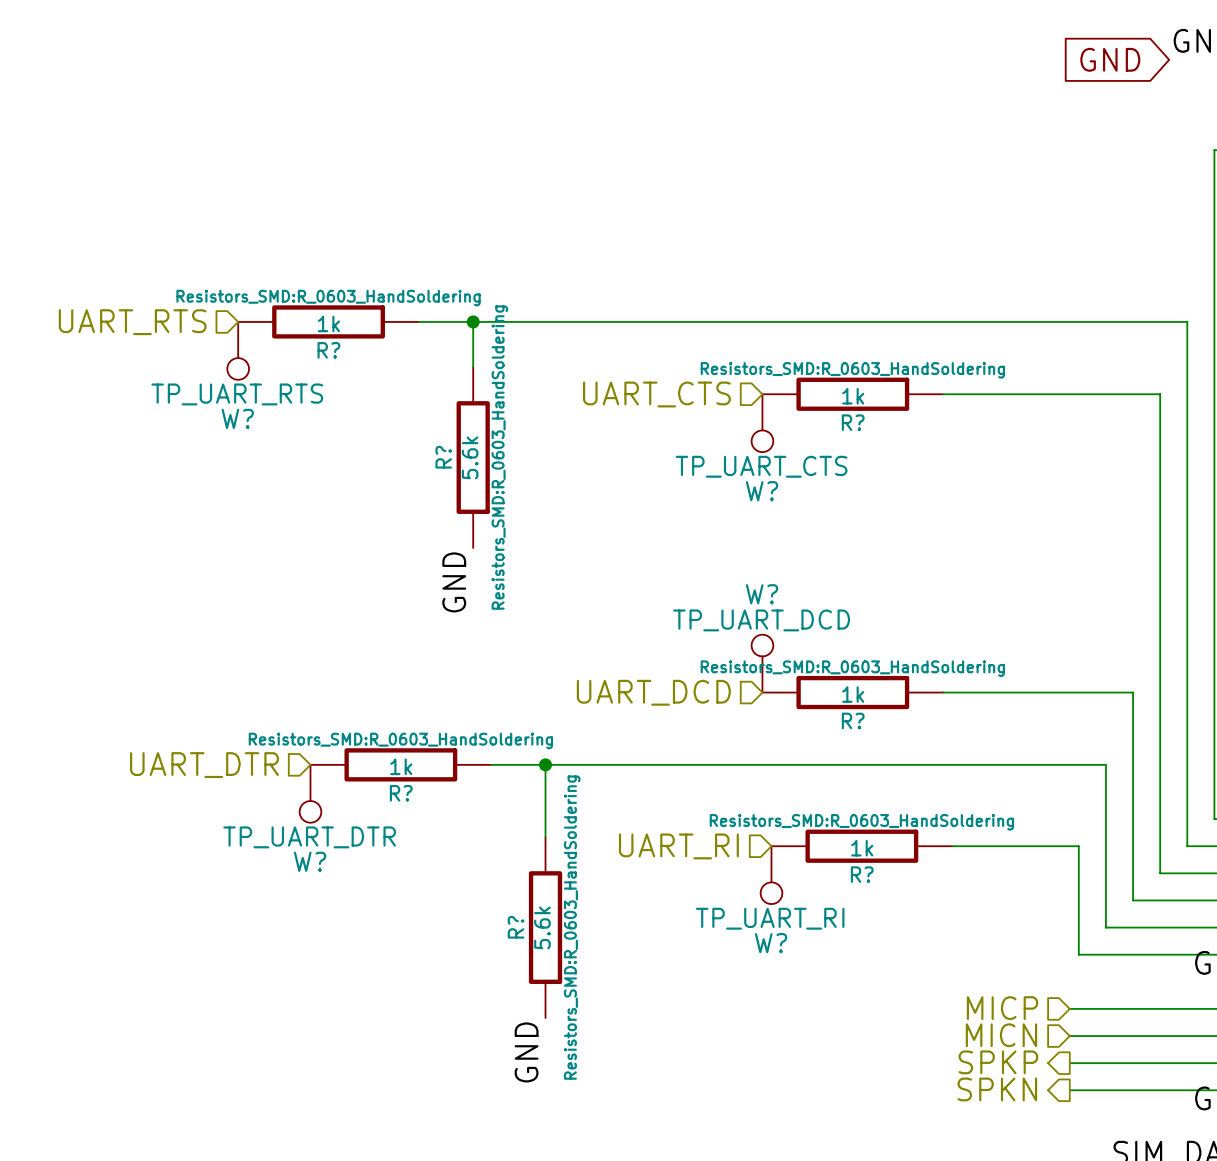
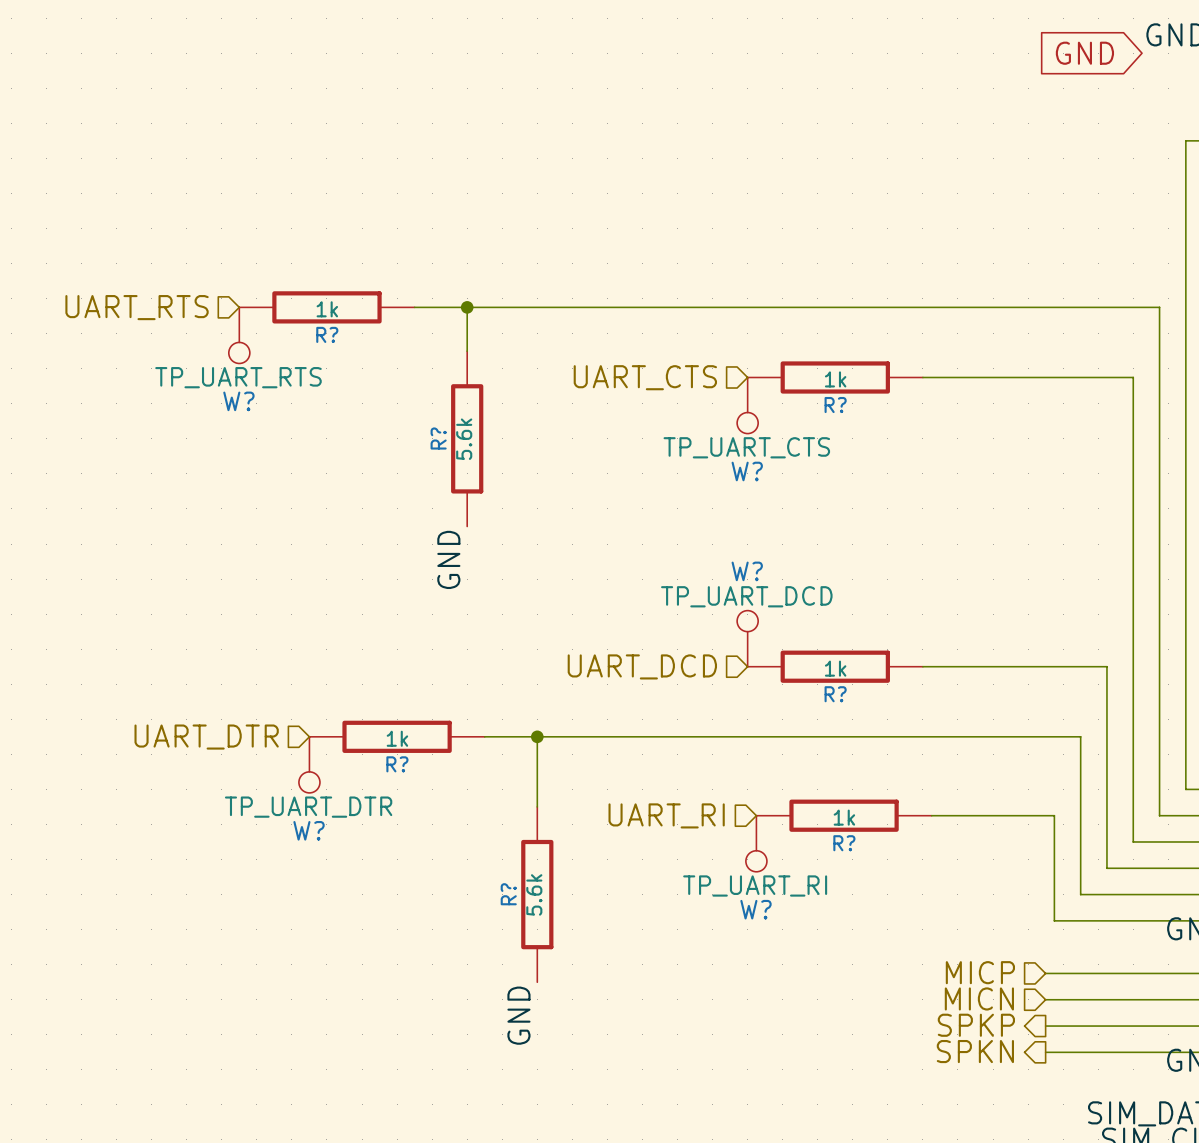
R? text: Resistors_SMD:R_0603_HandSoldering (328, 298) -> none
R? text: Resistors_SMD:R_0603_HandSoldering (852, 370) -> none
R? text: Resistors_SMD:R_0603_HandSoldering (499, 457) -> none
R? text: Resistors_SMD:R_0603_HandSoldering (852, 668) -> none
R? text: Resistors_SMD:R_0603_HandSoldering (400, 740) -> none
R? text: Resistors_SMD:R_0603_HandSoldering (861, 822) -> none
R? text: Resistors_SMD:R_0603_HandSoldering (572, 927) -> none

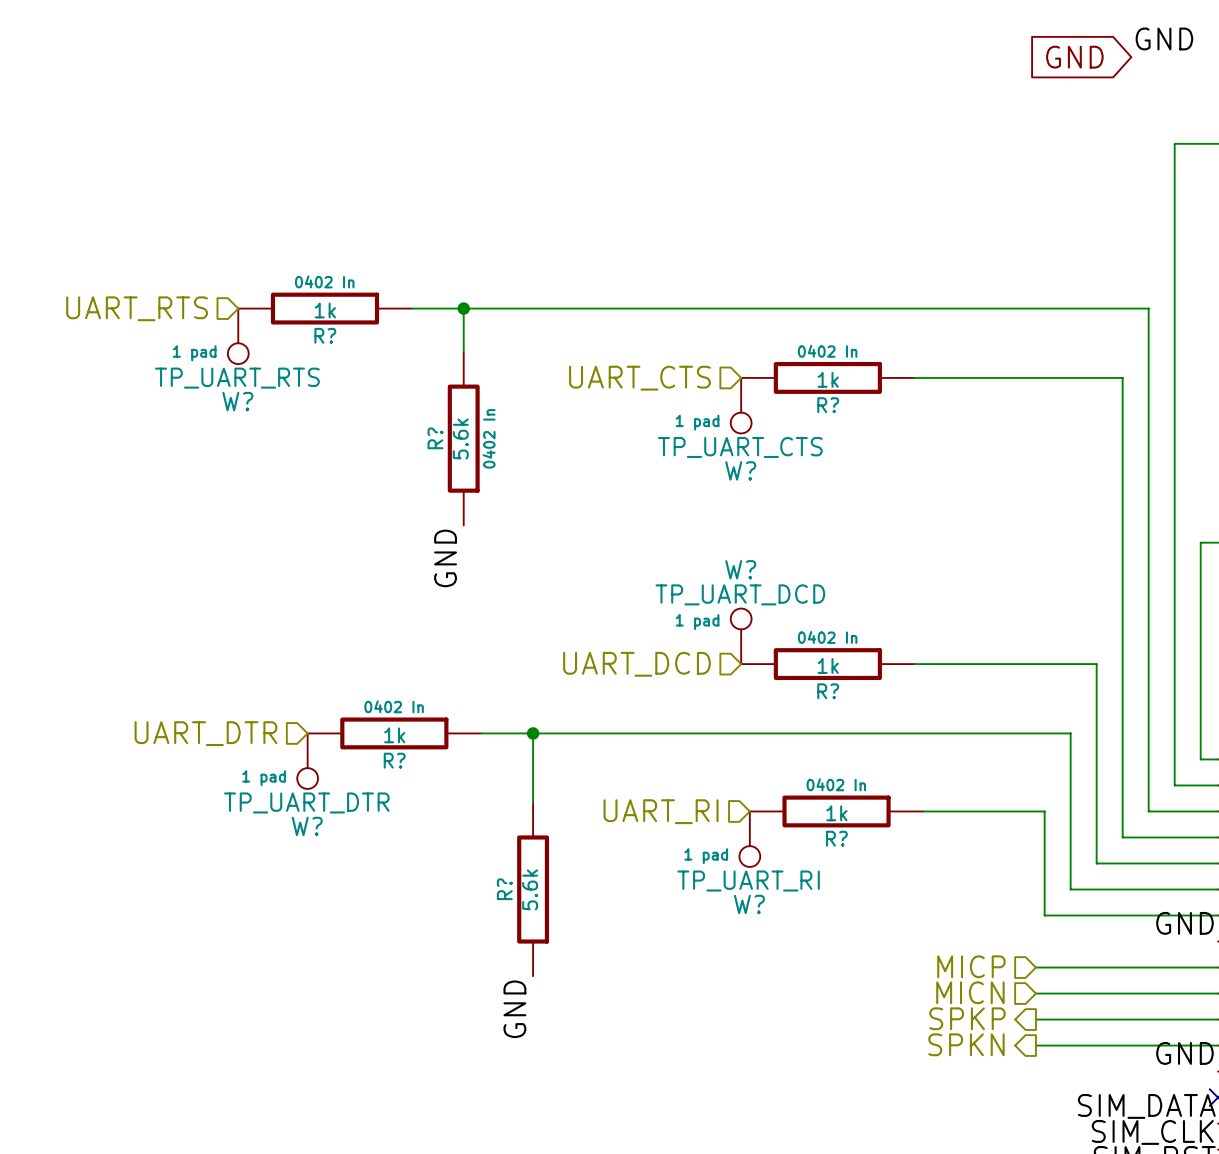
R? text: none -> 0402 In (324, 281)
R? text: none -> 0402 In (827, 351)
W? text: none -> 1 pad (194, 353)
W? text: none -> 1 pad (697, 422)
R? text: none -> 0402 In (489, 438)
W? text: none -> 1 pad (697, 622)
R? text: none -> 0402 In (827, 637)
R? text: none -> 0402 In (394, 706)
W? text: none -> 1 pad (264, 778)
R? text: none -> 0402 In (836, 784)
W? text: none -> 1 pad (706, 856)

